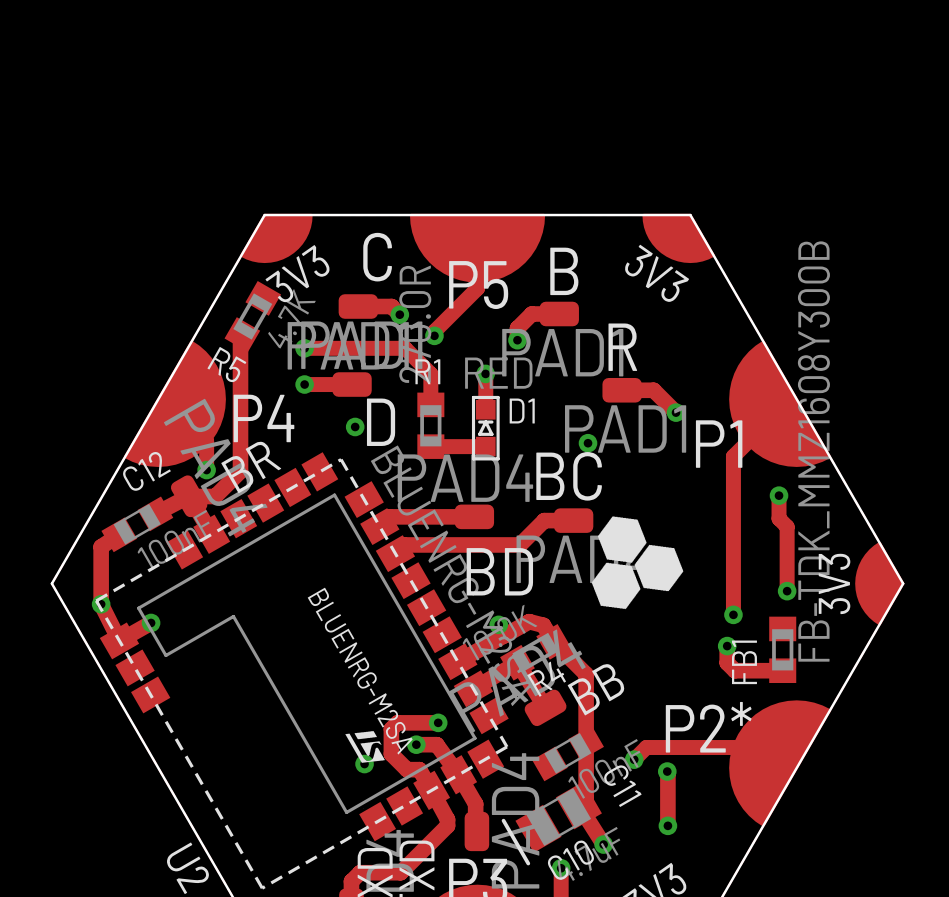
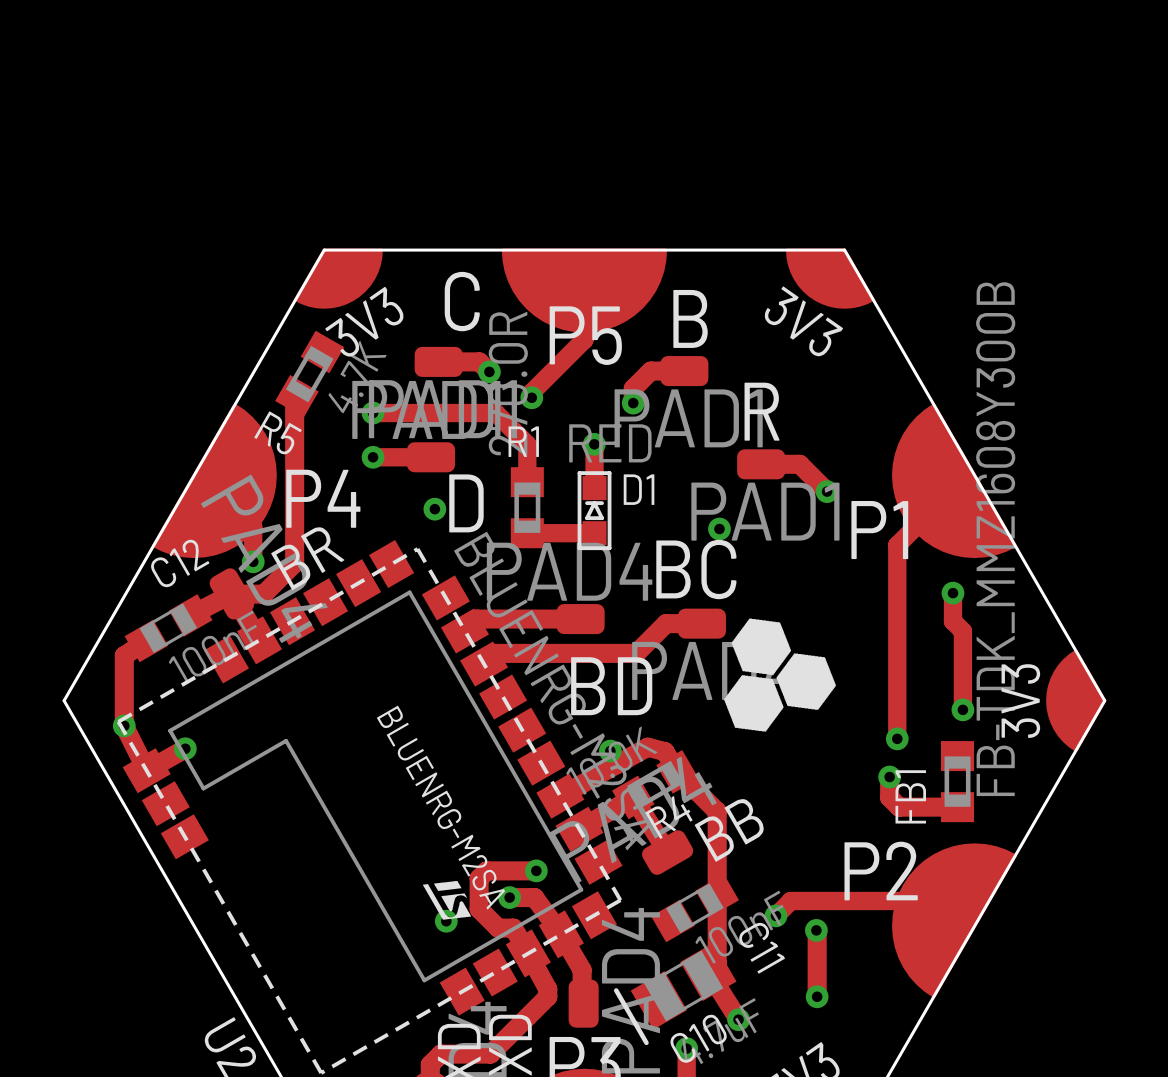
text: P2* (708, 727) -> P2 (881, 871)

